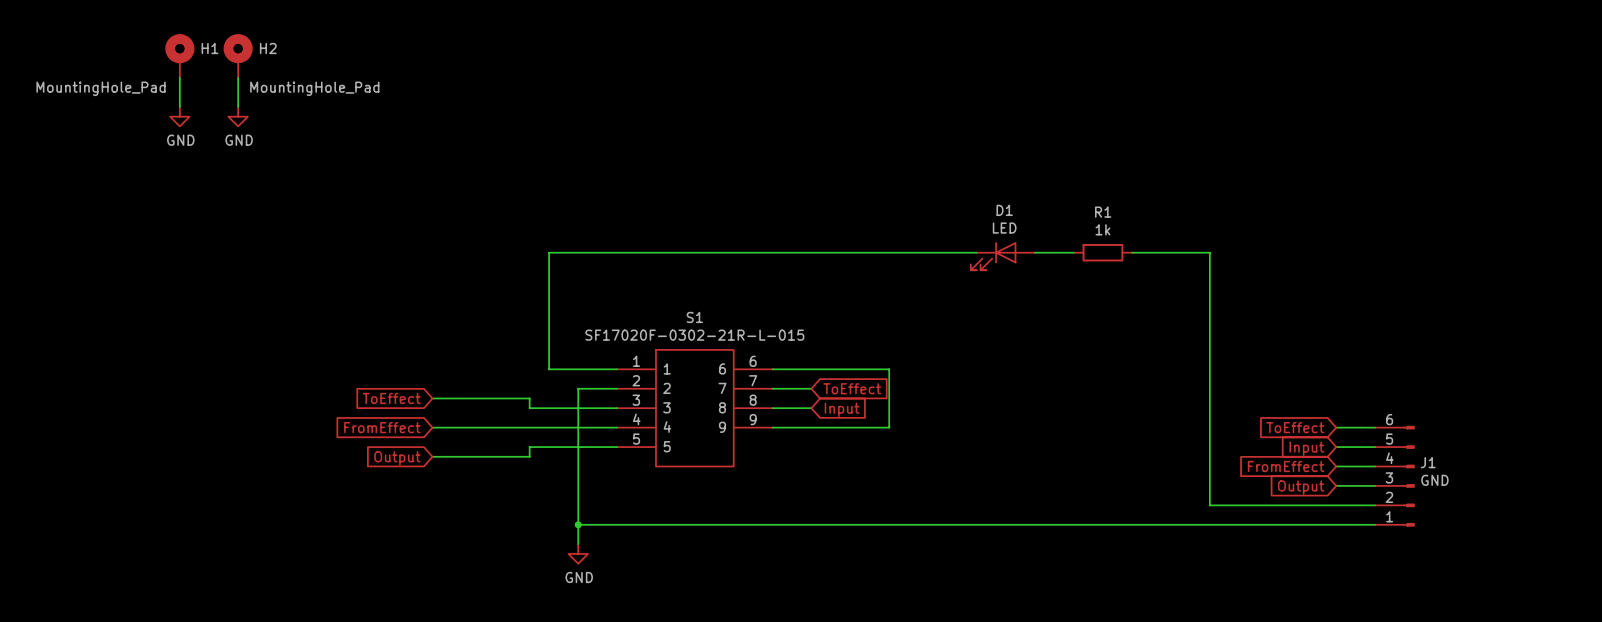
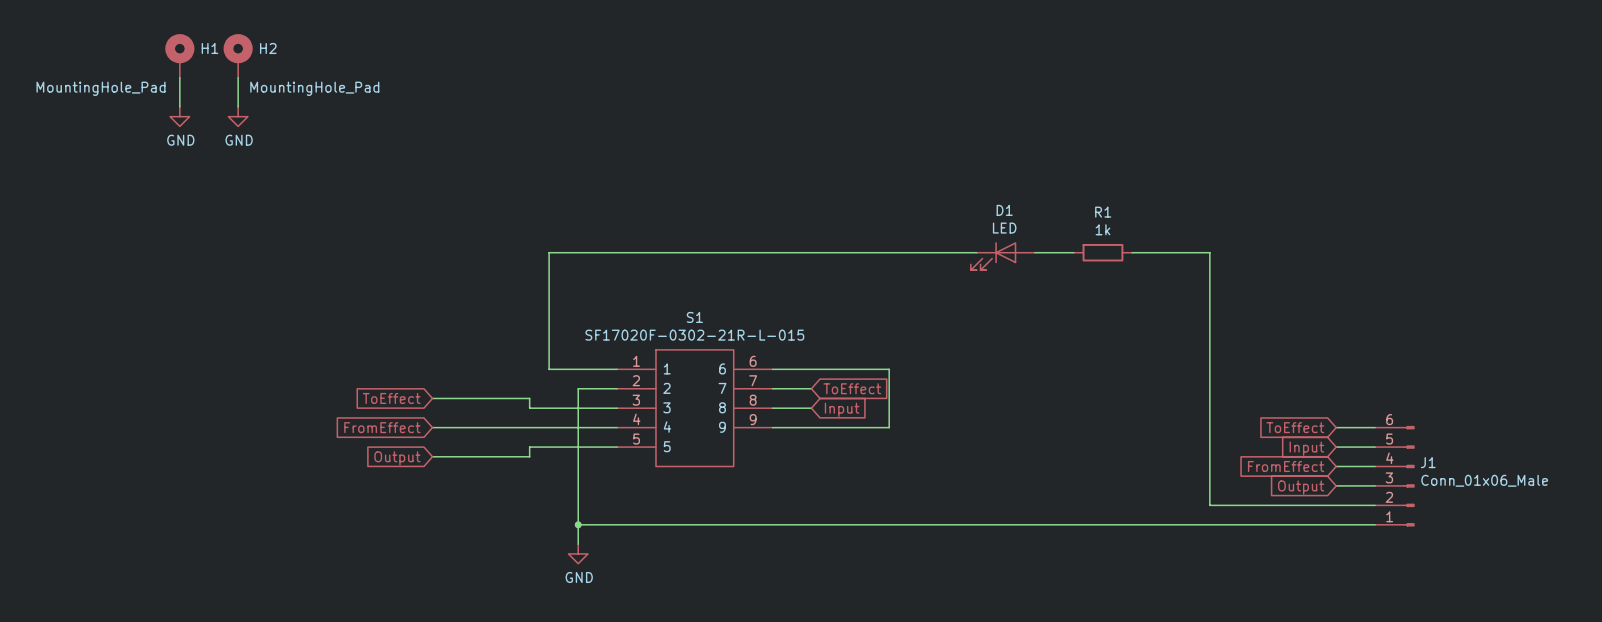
J1 value: GND (1434, 480) -> Conn_01x06_Male (1484, 480)

